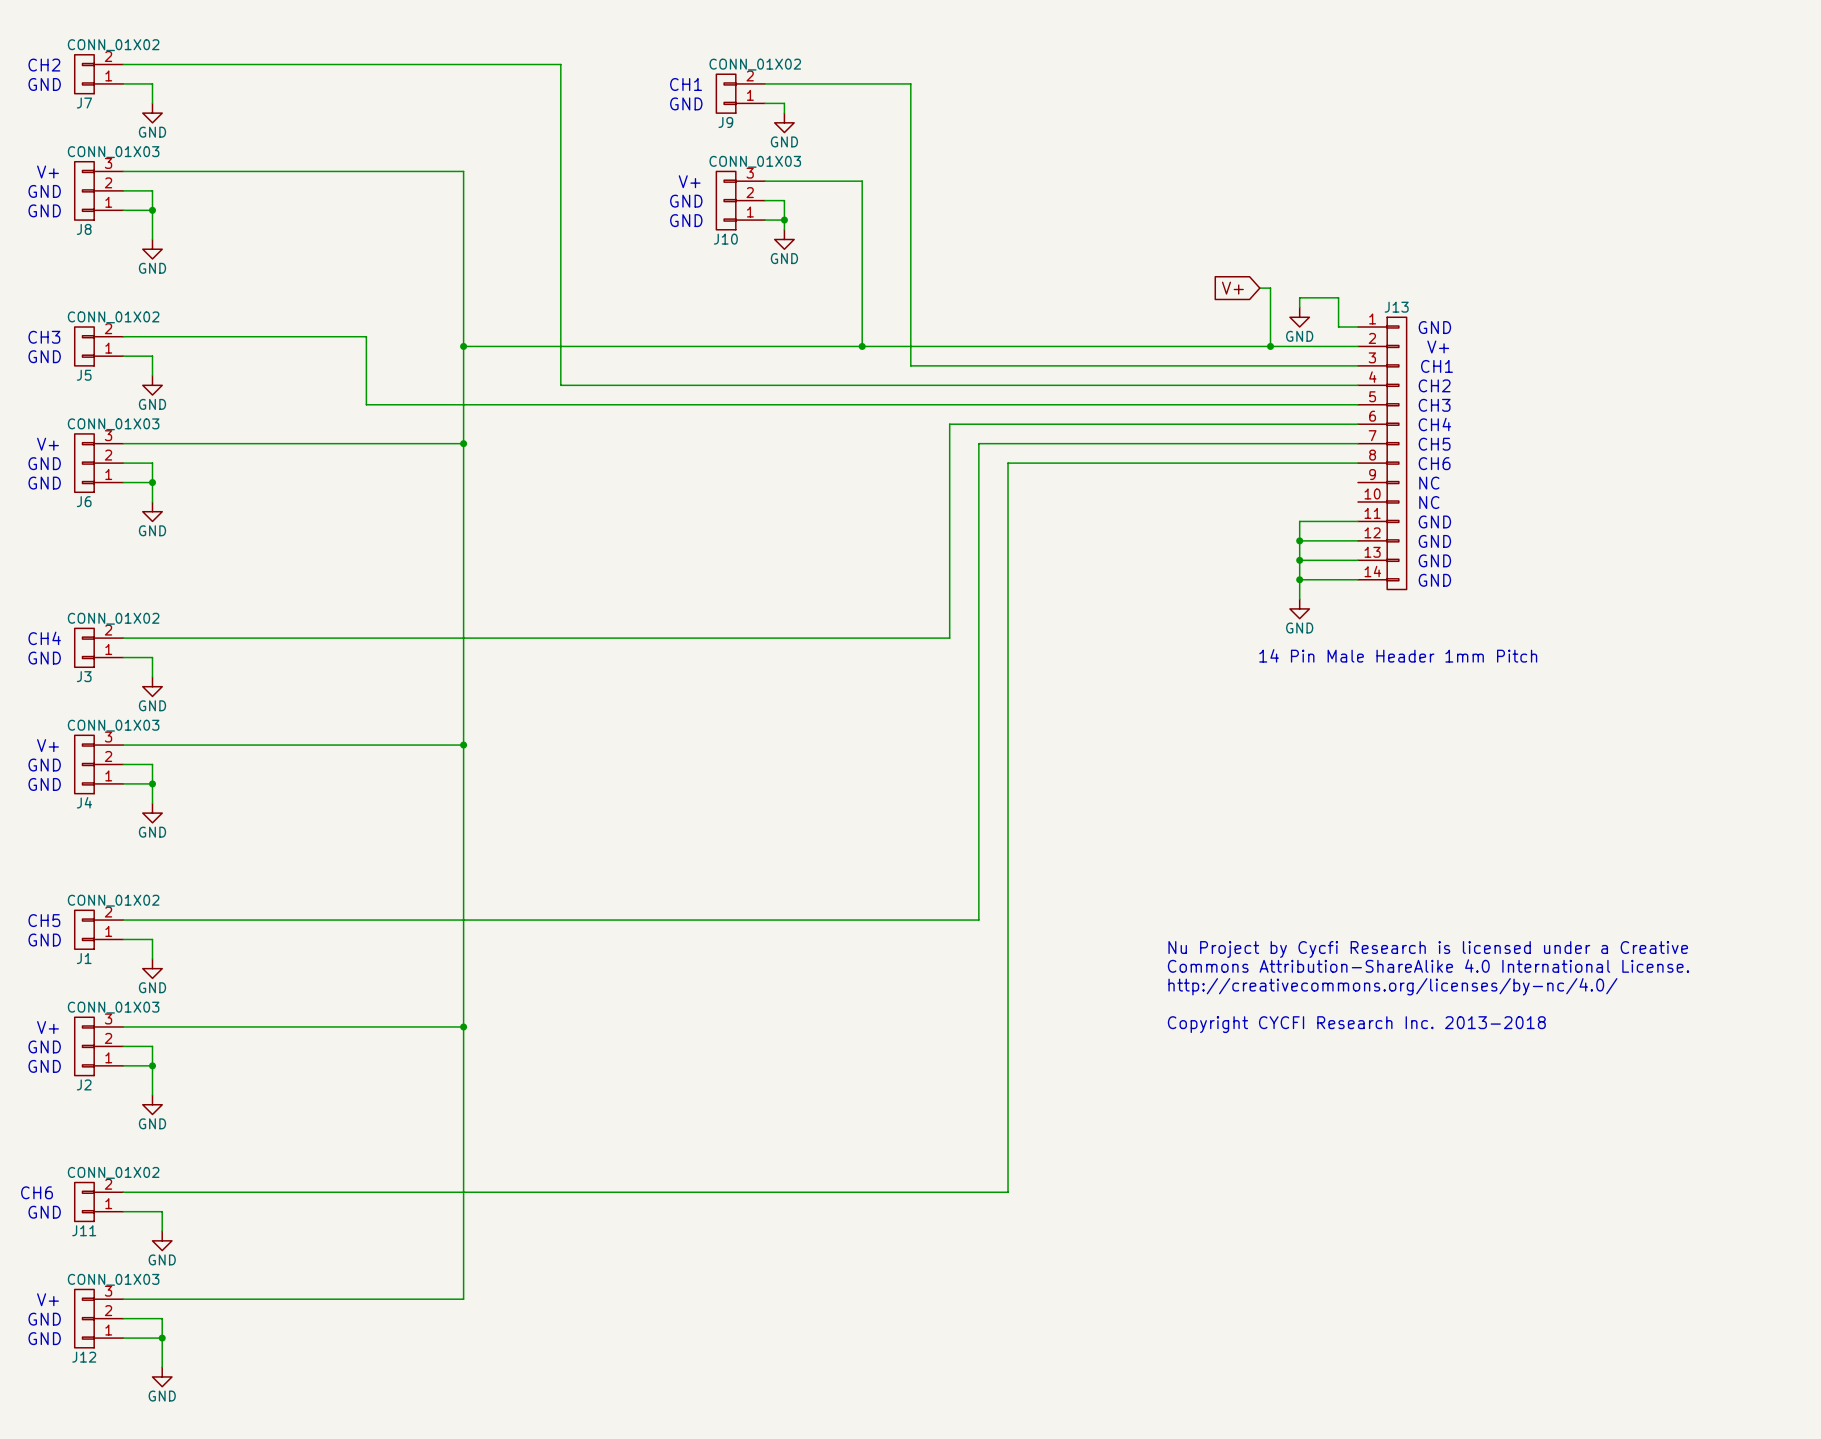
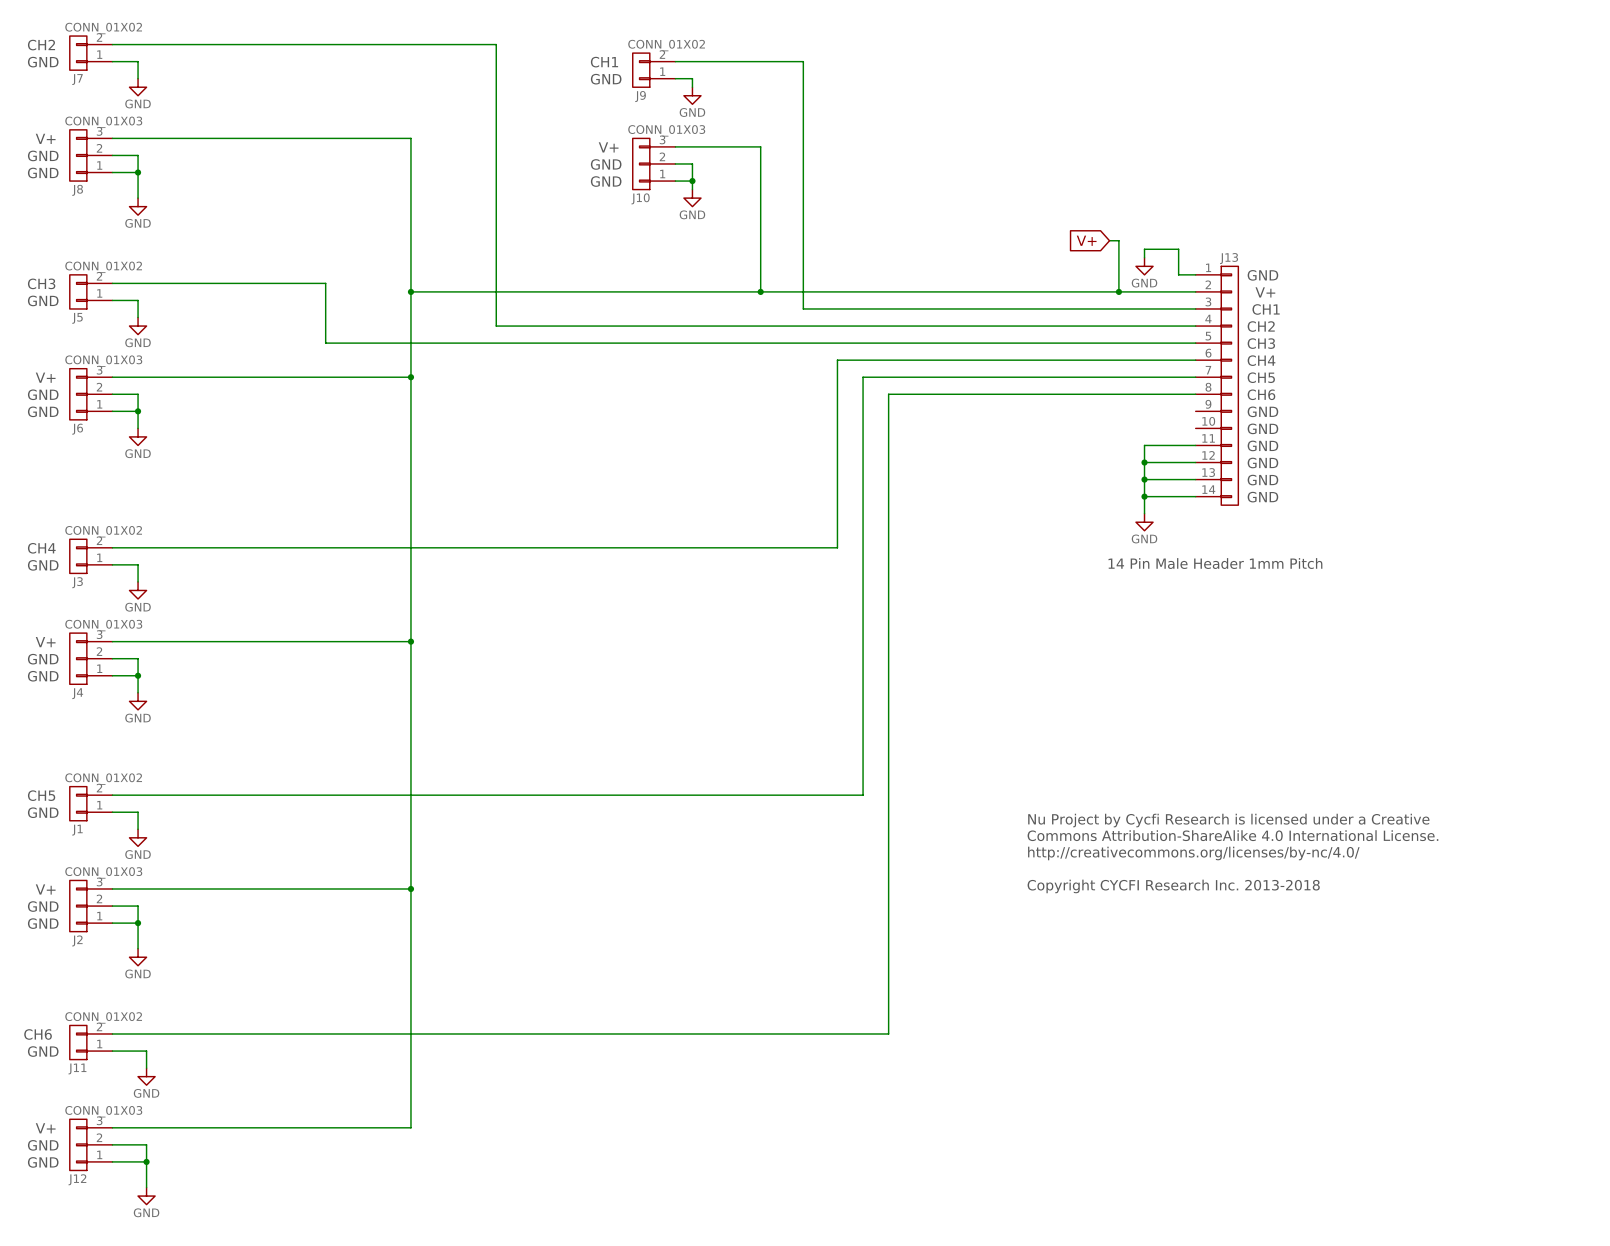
text: NC (1429, 483) -> GND (1262, 411)
text: NC (1429, 502) -> GND (1262, 428)

